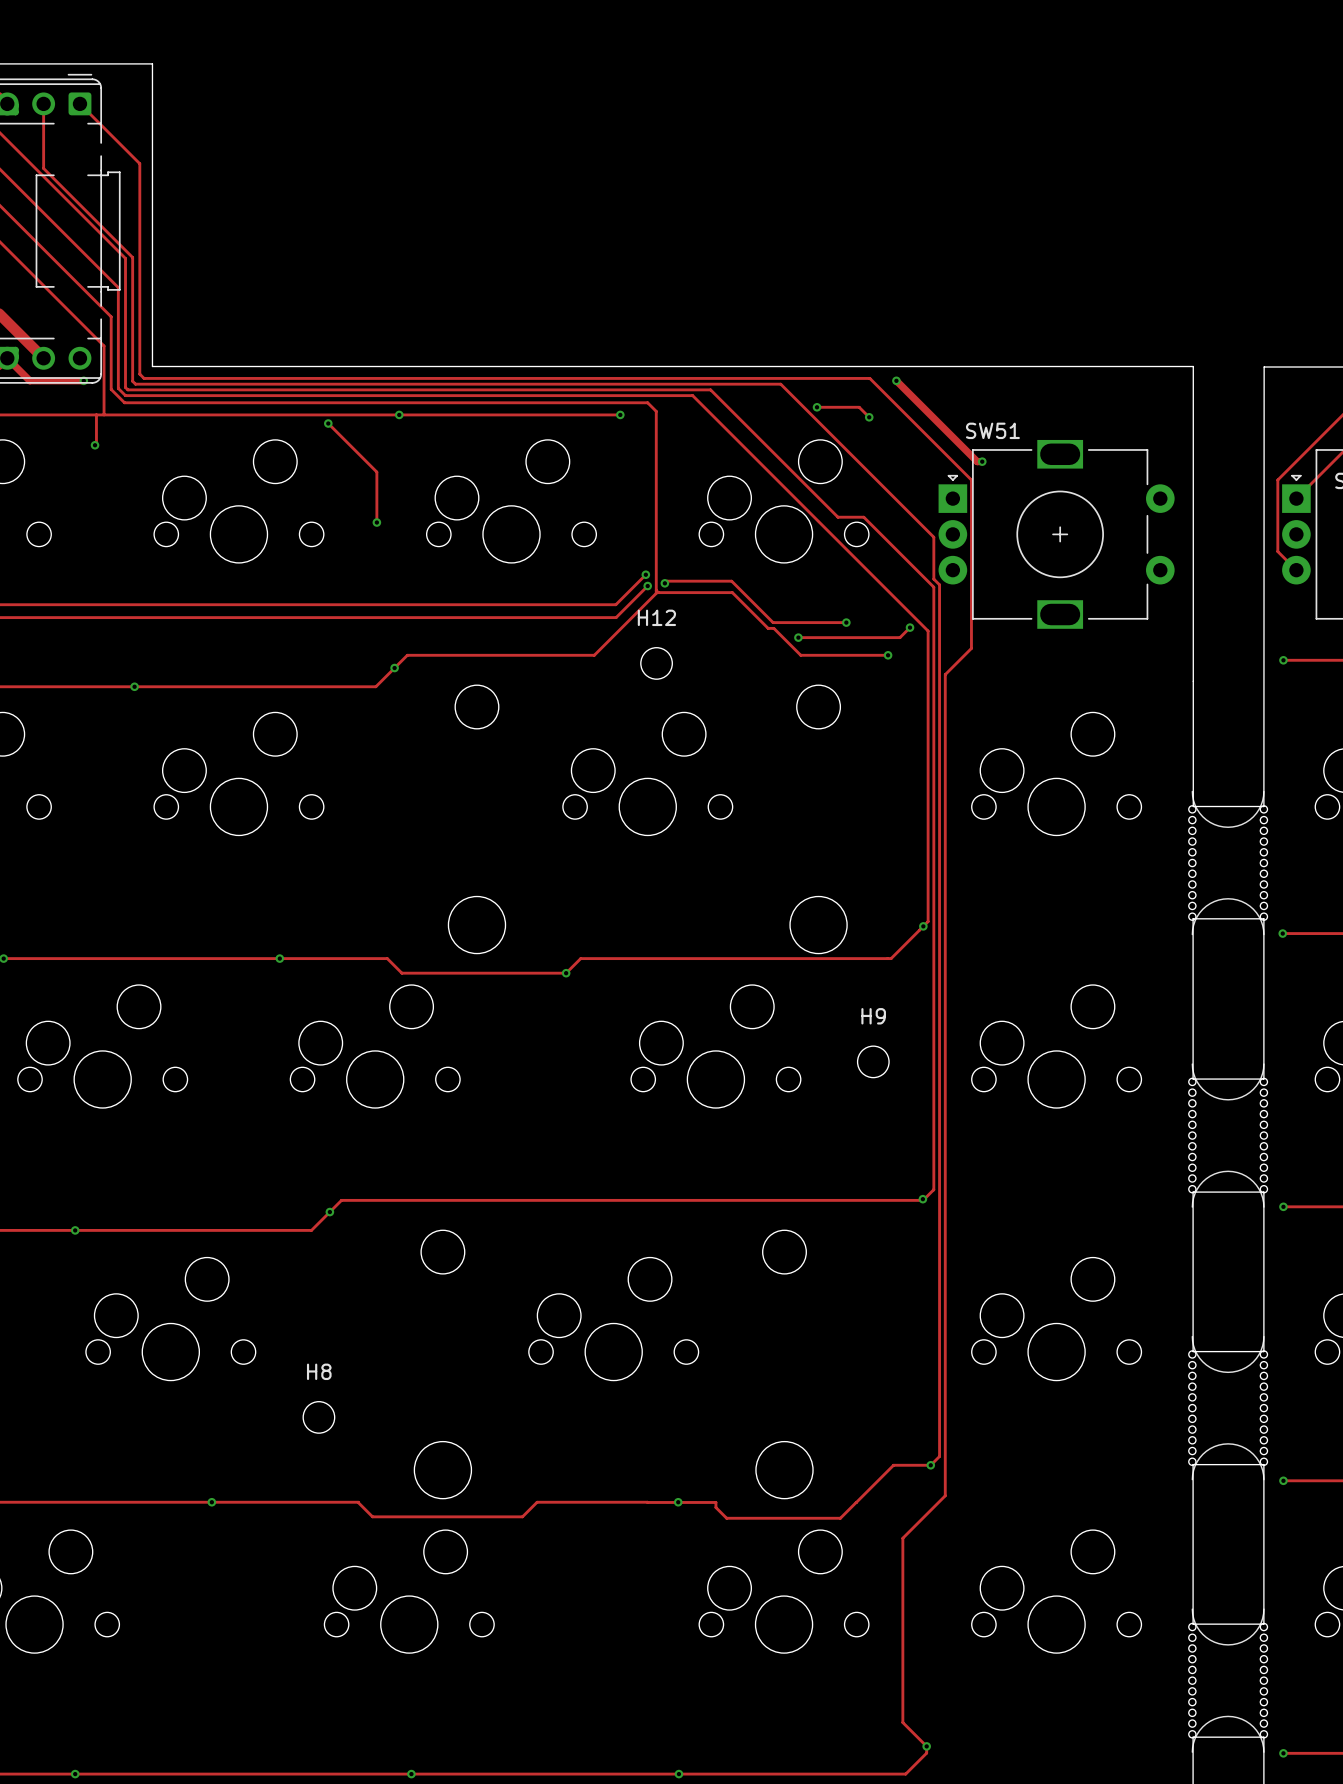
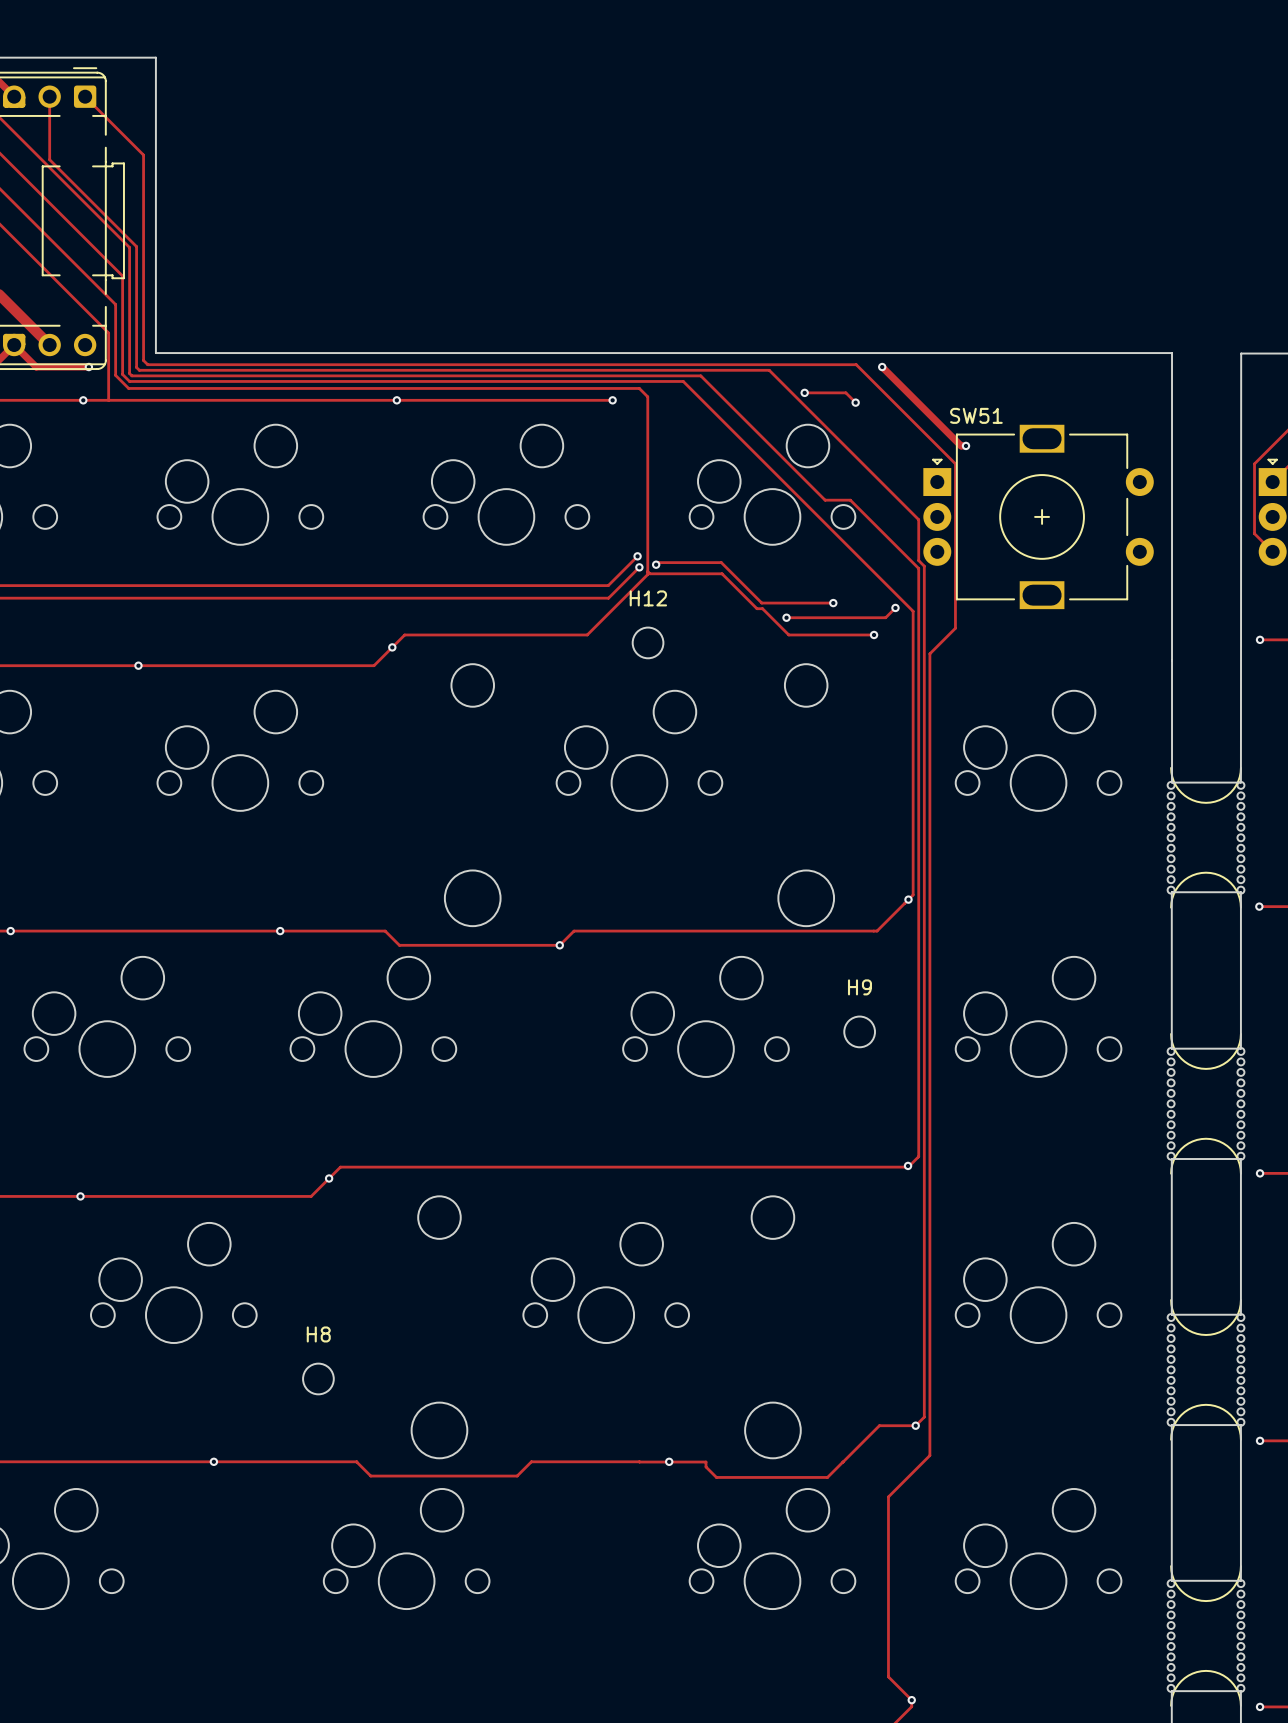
track: (96, 414) (95, 445) -> none
track: (328, 423) (376, 472) (376, 522) -> none
via: (328, 423) -> none
via position: (95, 445) -> (83, 400)
via: (376, 522) -> none

